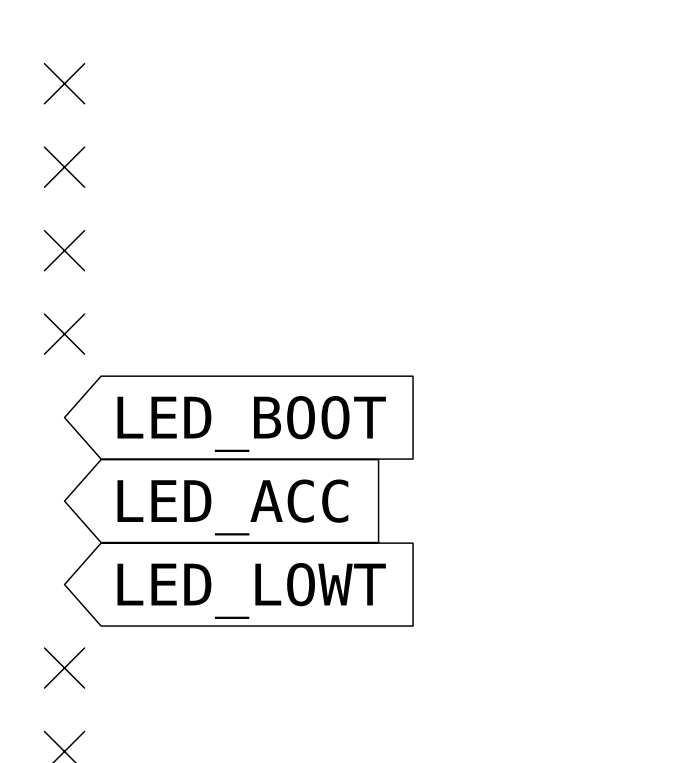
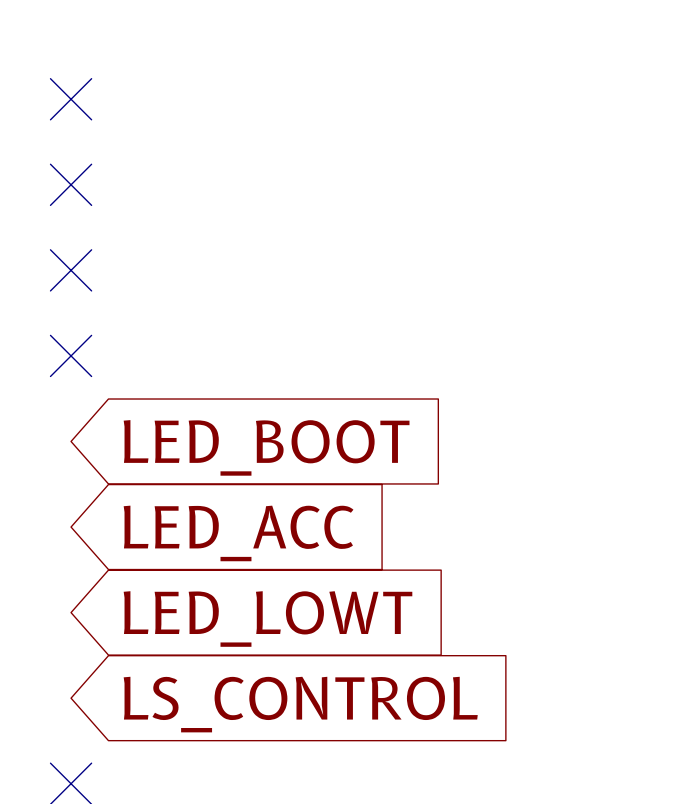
no-connect mark: (64, 668) -> none
global label: none -> LS_CONTROL (300, 704)

